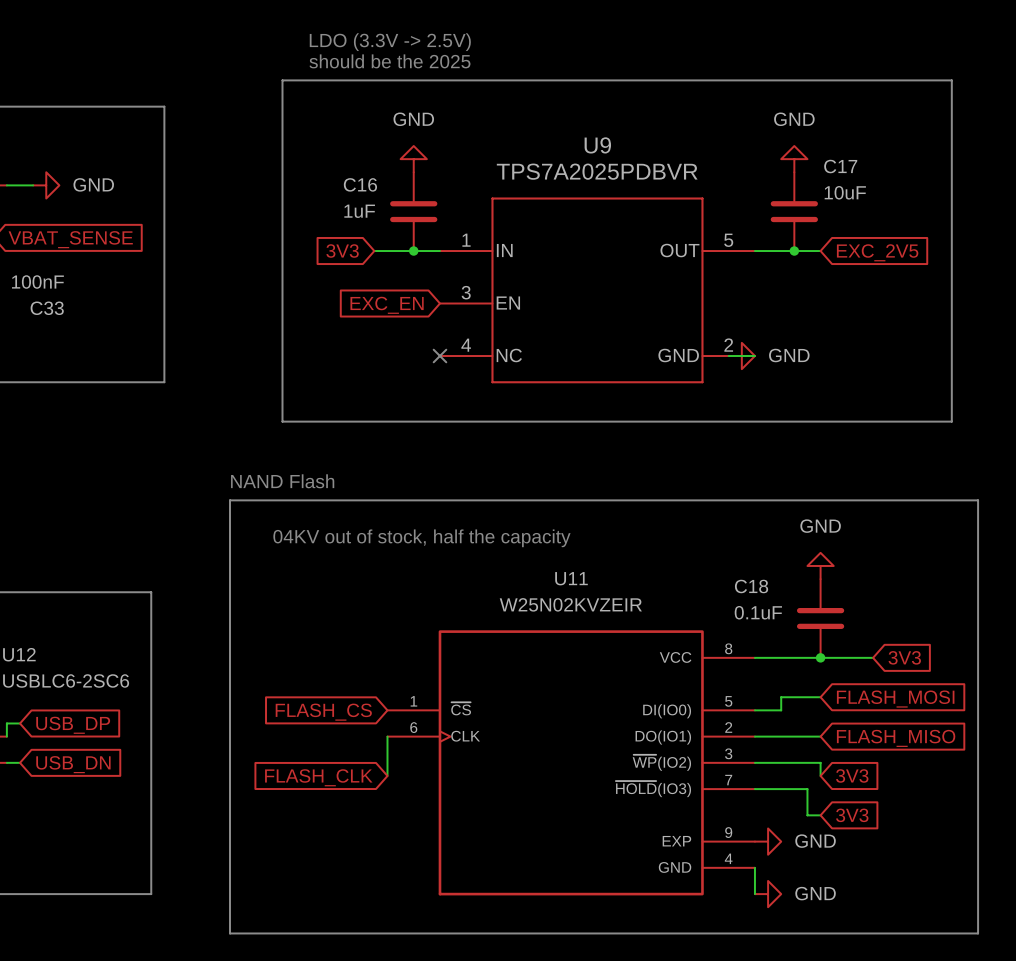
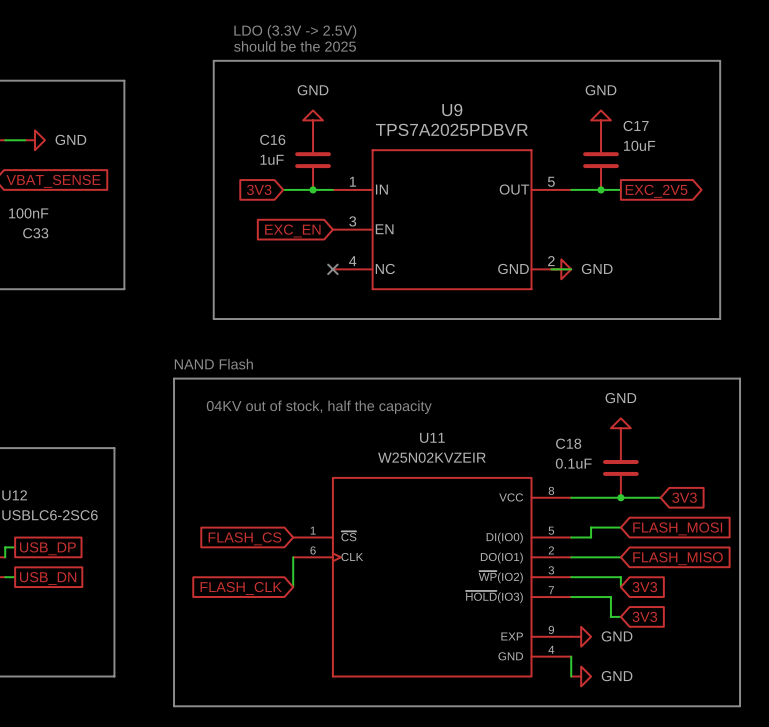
global label shape: input (877, 252) -> output (656, 191)
global label shape: input (73, 725) -> passive (47, 548)
global label shape: input (73, 764) -> passive (48, 578)

